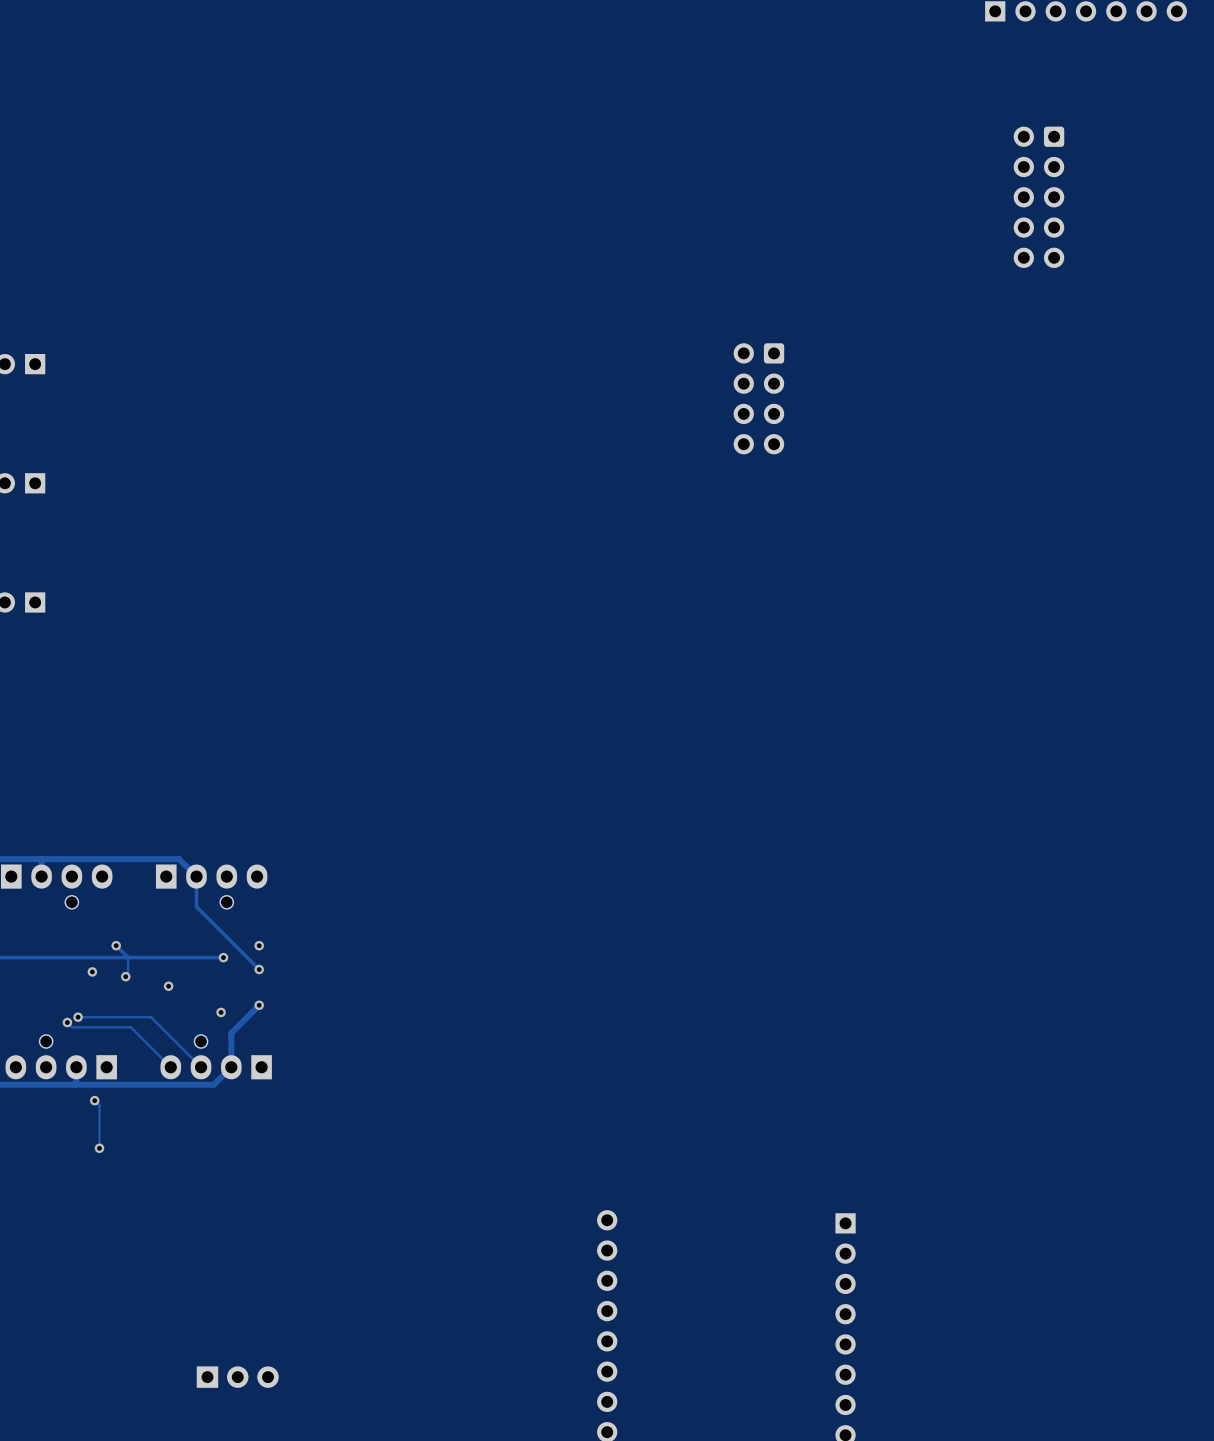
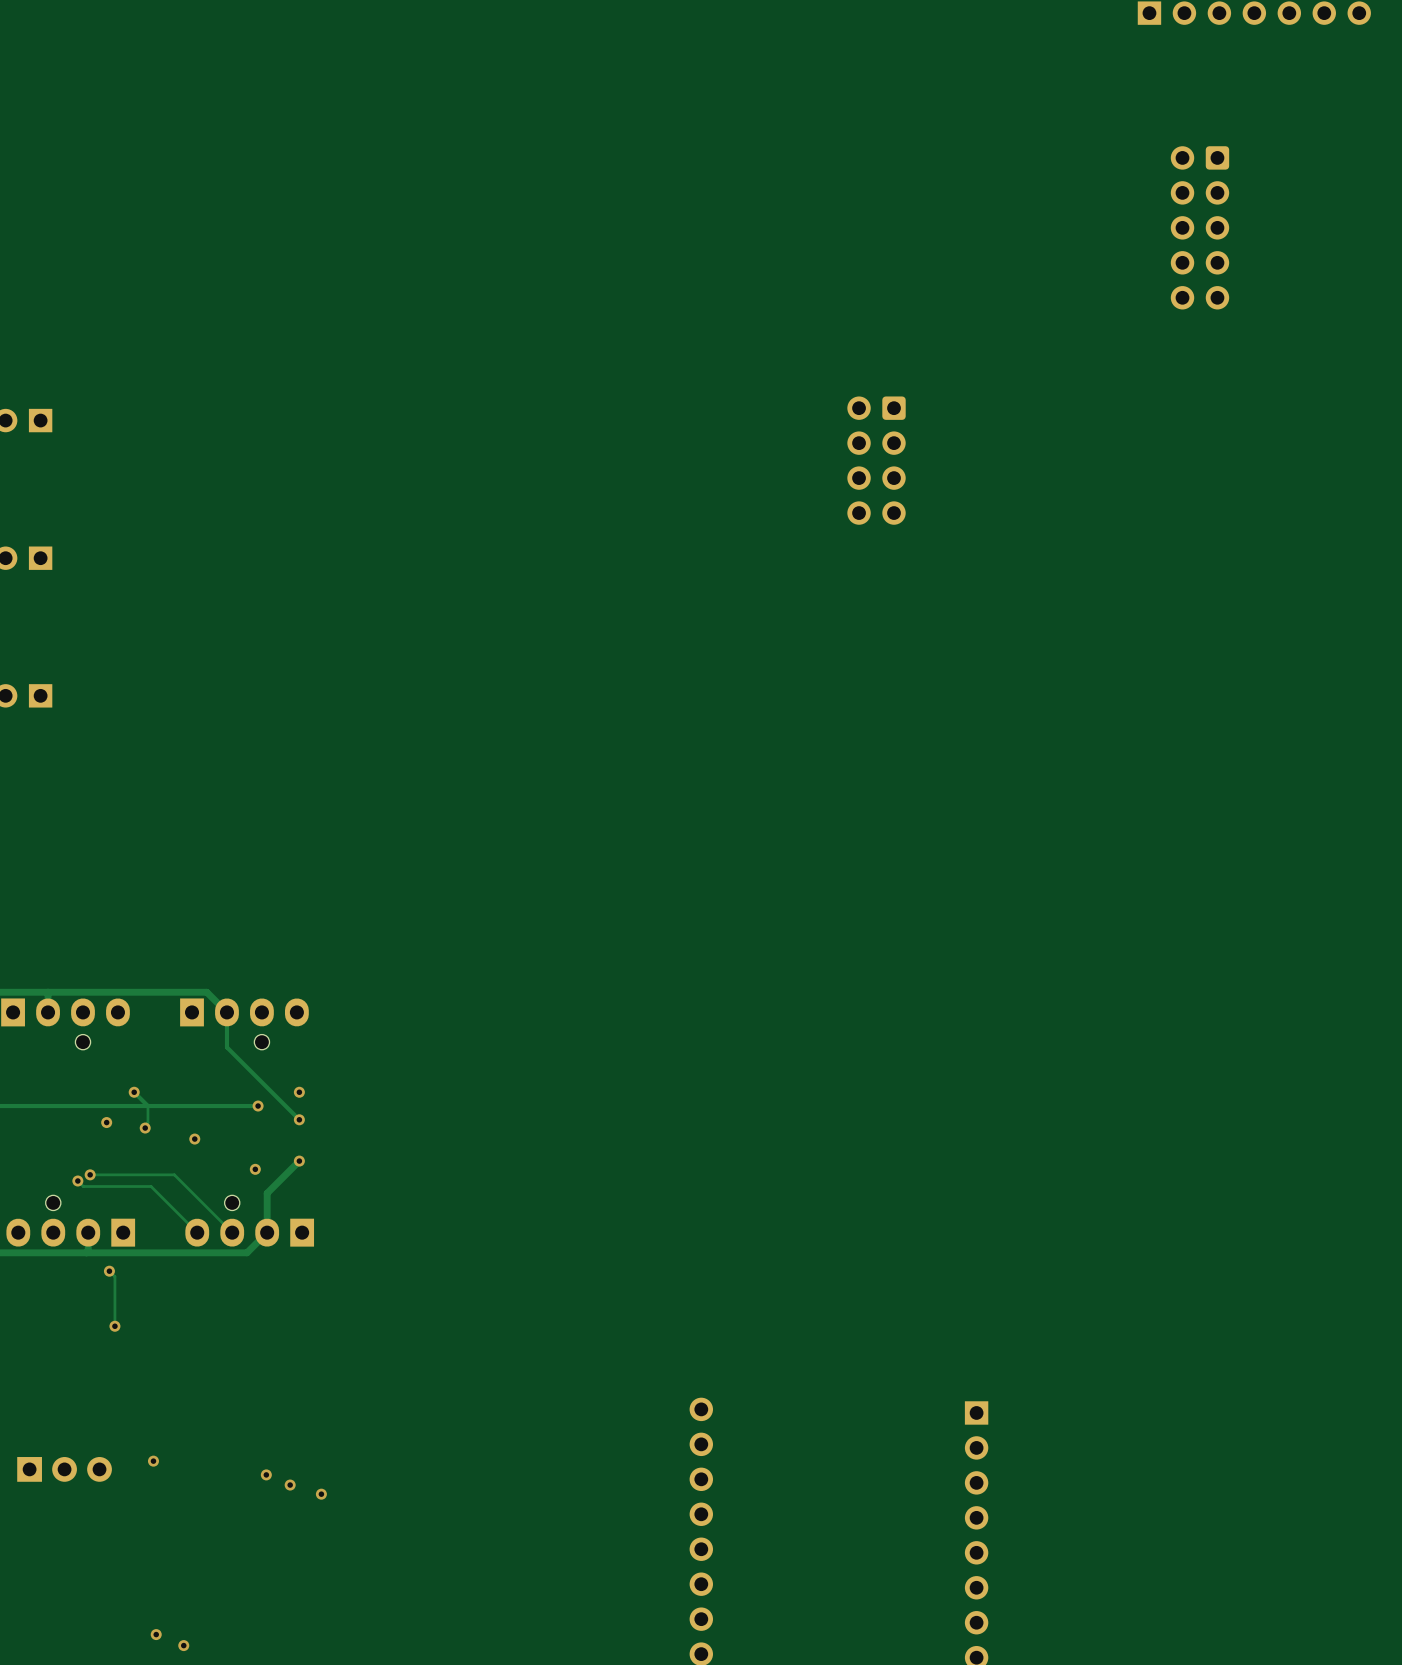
via: none -> (153, 1461)
via: none -> (266, 1474)
via: none -> (290, 1485)
via: none -> (321, 1494)
part position: (237, 1377) -> (64, 1469)
via: none -> (156, 1634)
via: none -> (183, 1645)

